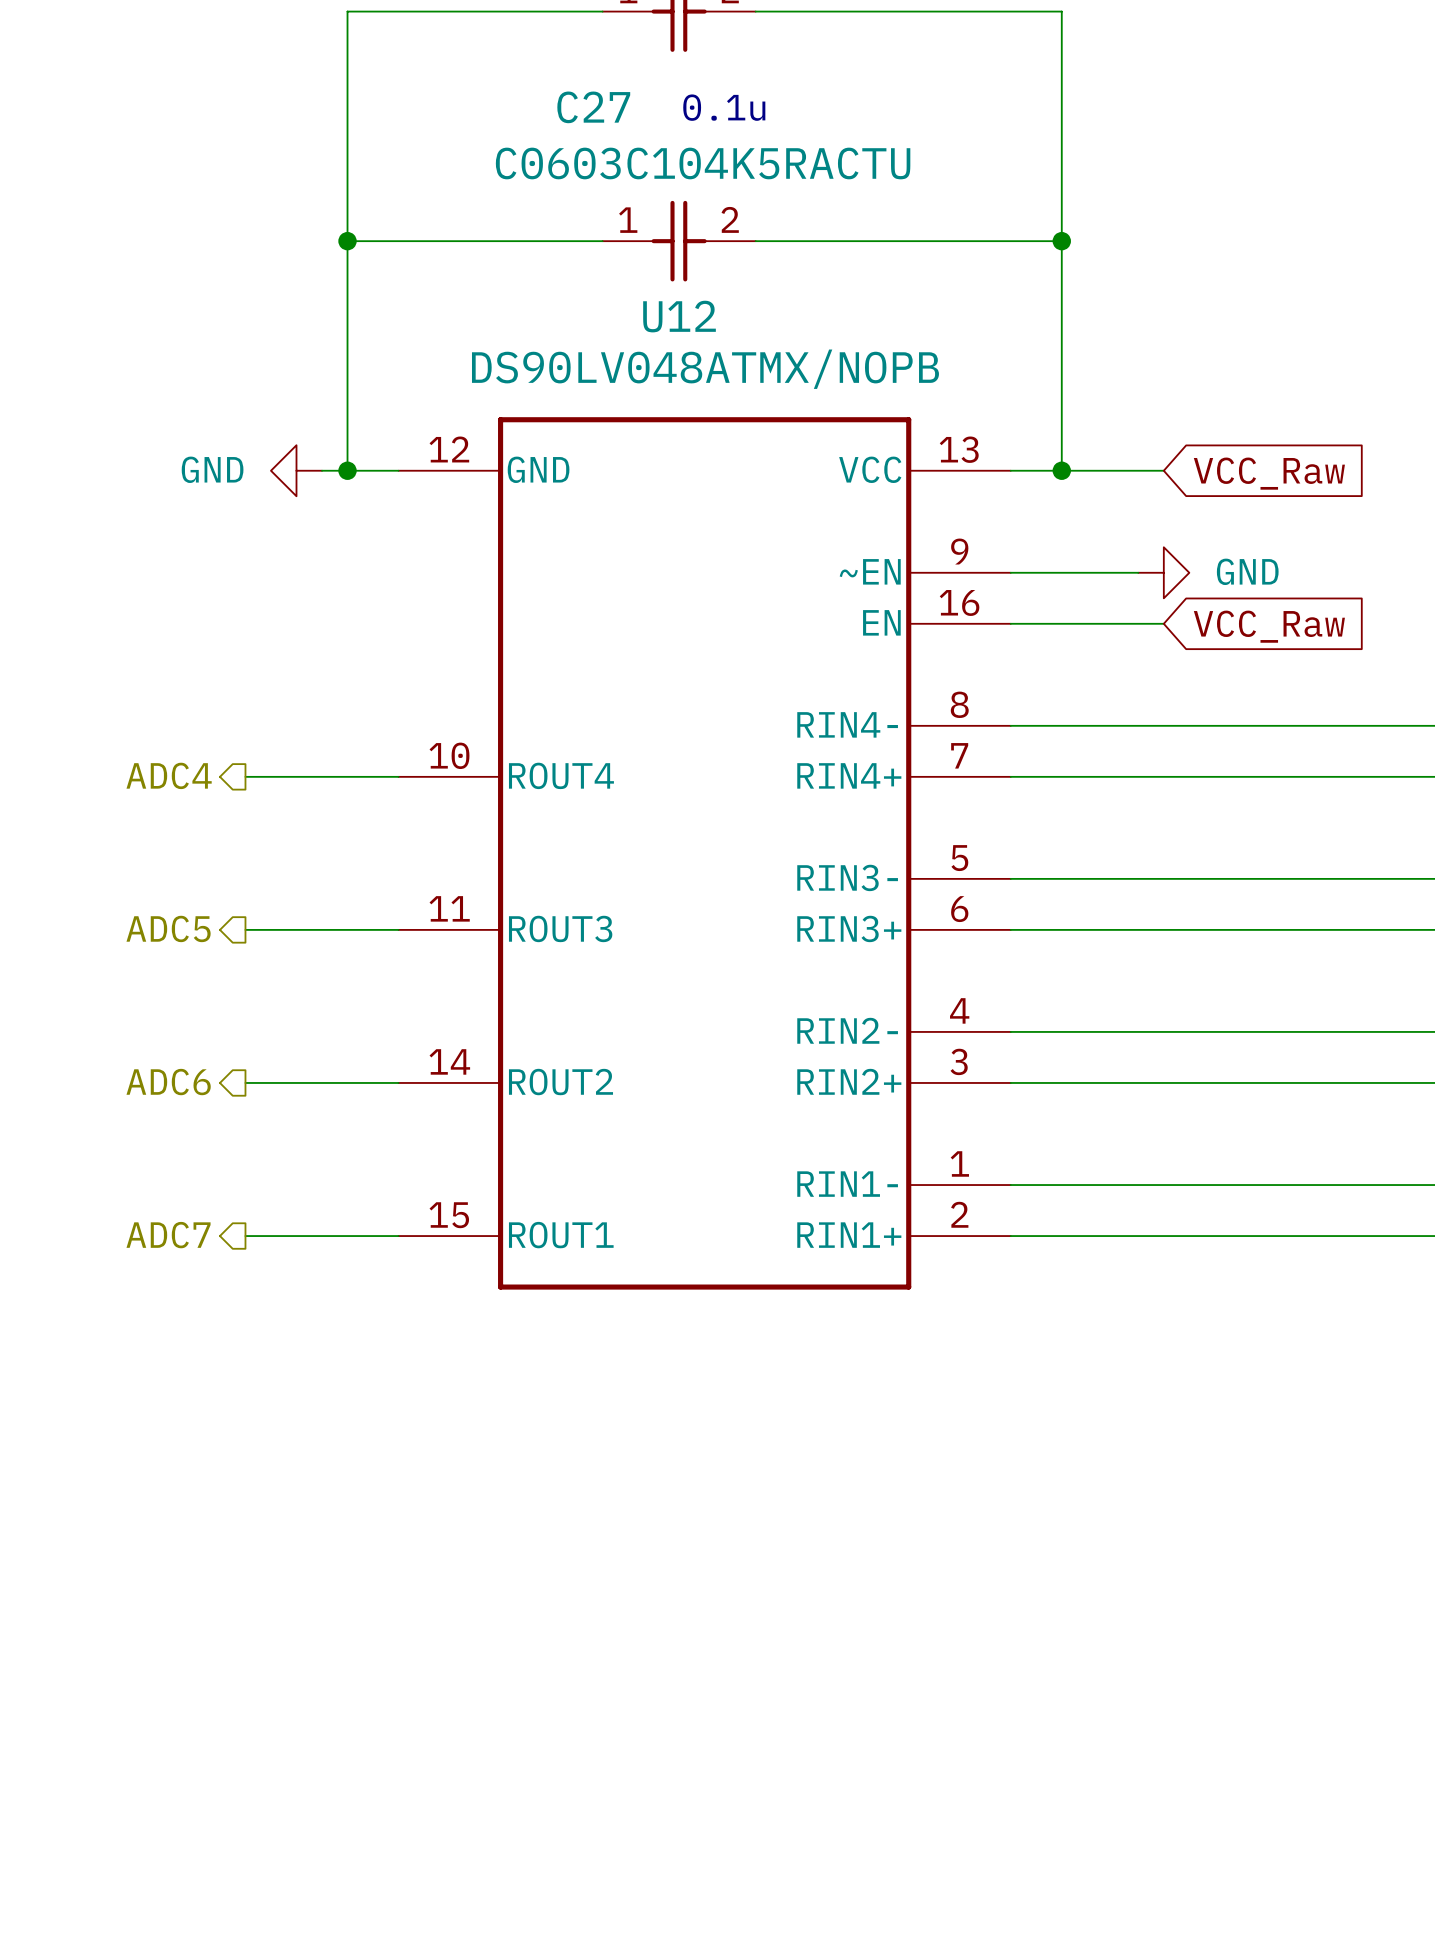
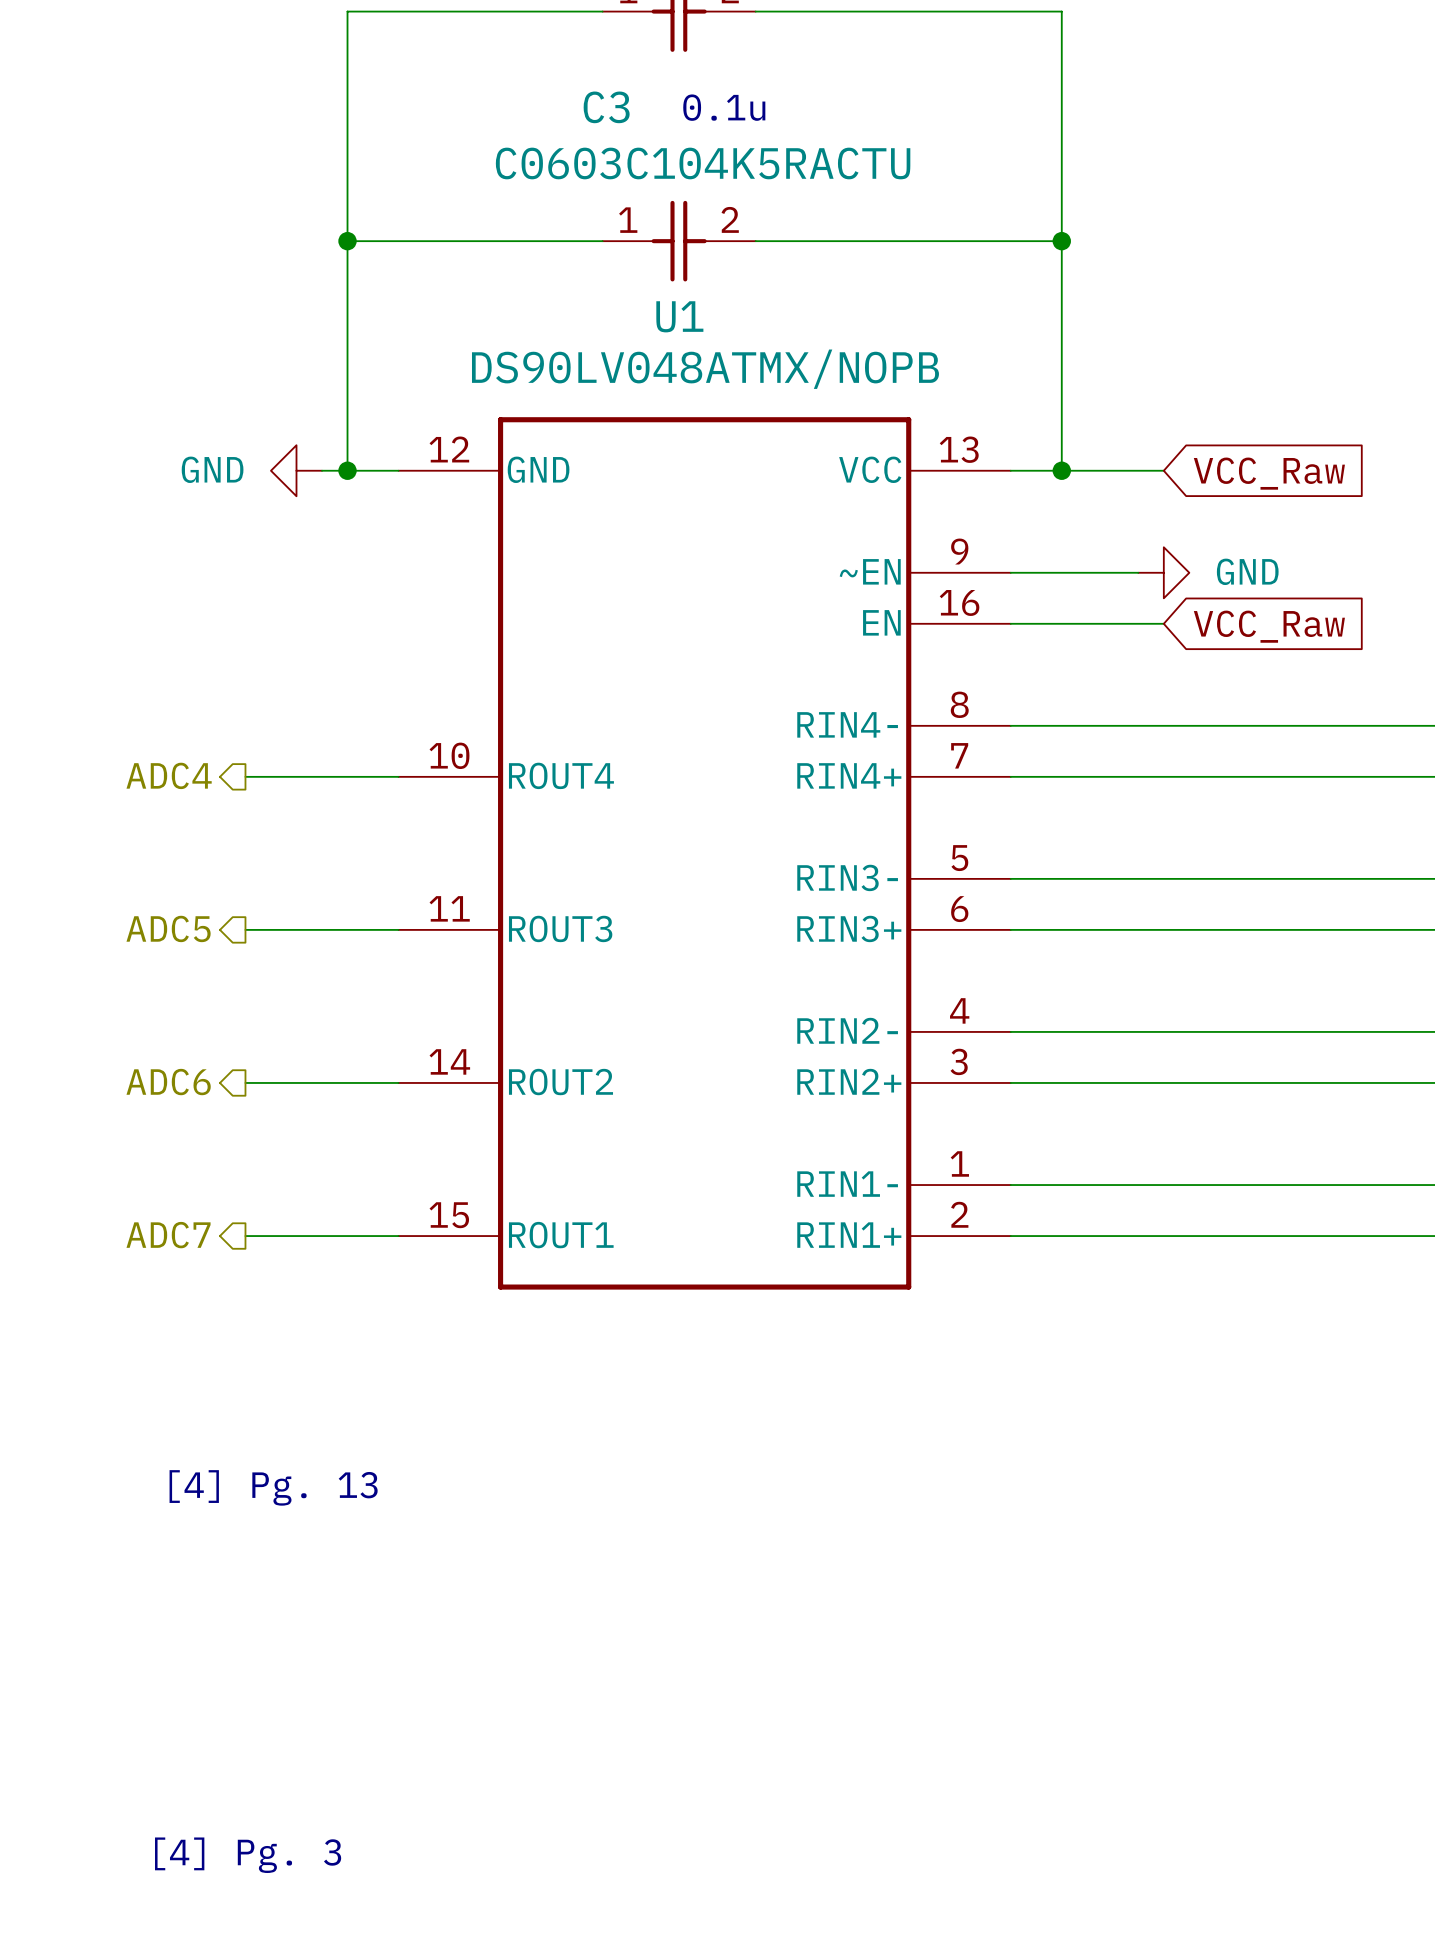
C27 name: C27 (593, 107) -> C3 (606, 107)
U12 name: U12 (679, 316) -> U1 (679, 316)
text: none -> [4] Pg. 13 (273, 1487)
text: none -> [4] Pg. 3 (248, 1855)

